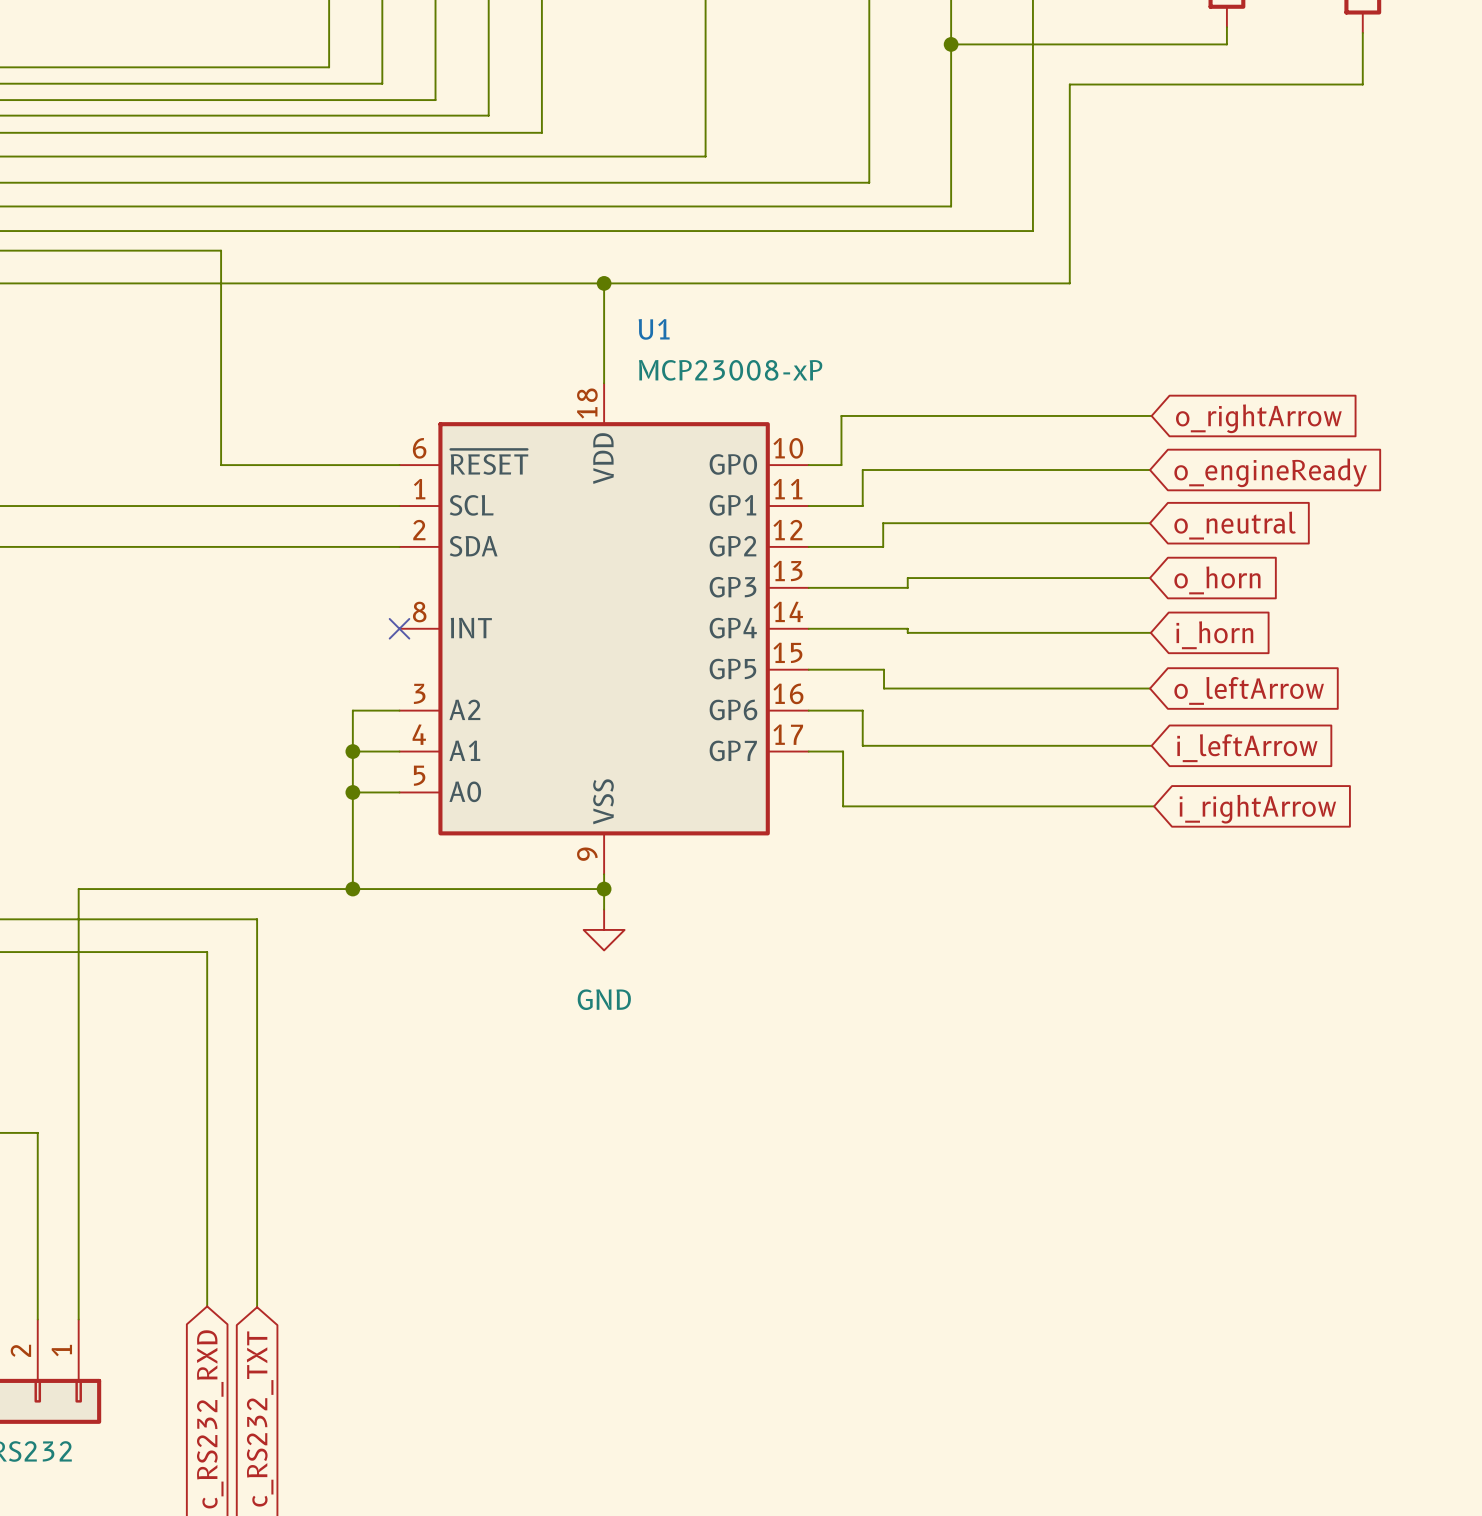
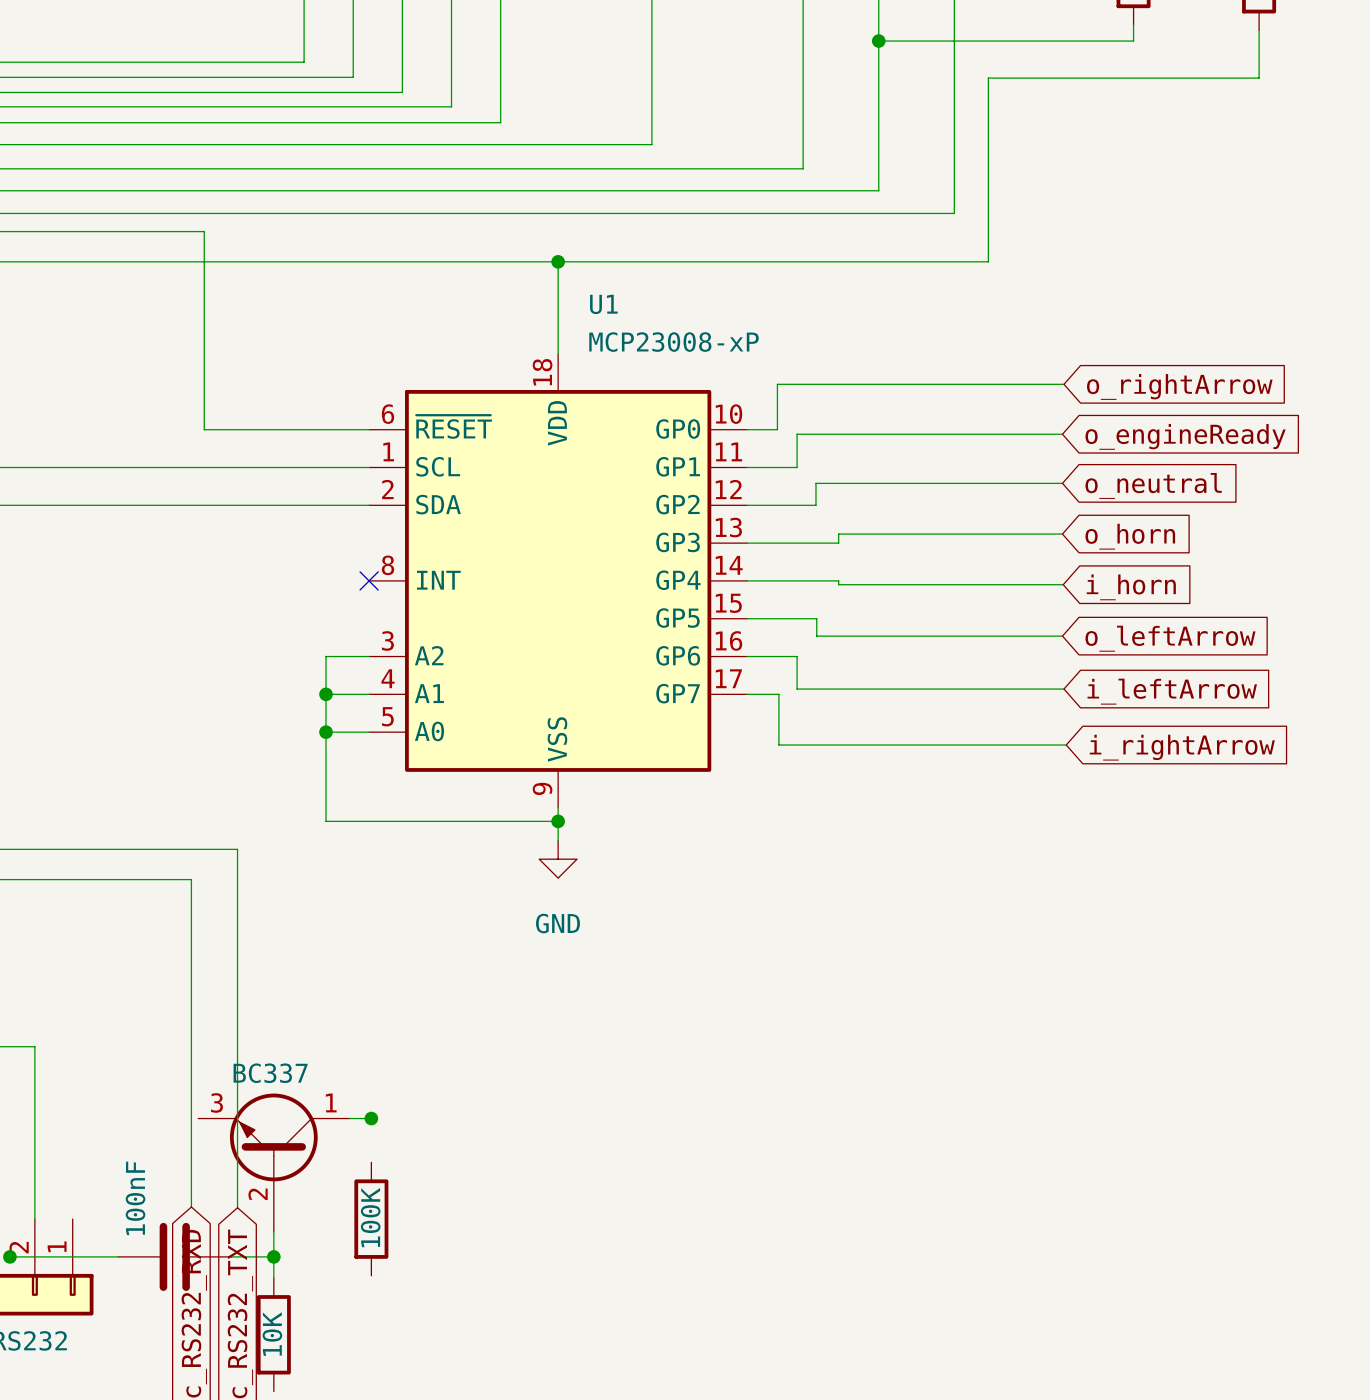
wire: (352, 889) (78, 889) (78, 1319) -> none
junction: (352, 889) -> none
wire: none -> (349, 1118) (371, 1118)
junction: none -> (371, 1118)
part: none -> BC337 (273, 1162)
part: none -> 100K (371, 1219)
wire: none -> (273, 1231) (273, 1278)
wire: none -> (9, 1256) (118, 1256)
junction: none -> (9, 1256)
part: none -> 100nF (174, 1256)
wire: none -> (231, 1256) (273, 1256)
junction: none -> (273, 1256)
part: none -> 10K (273, 1334)

